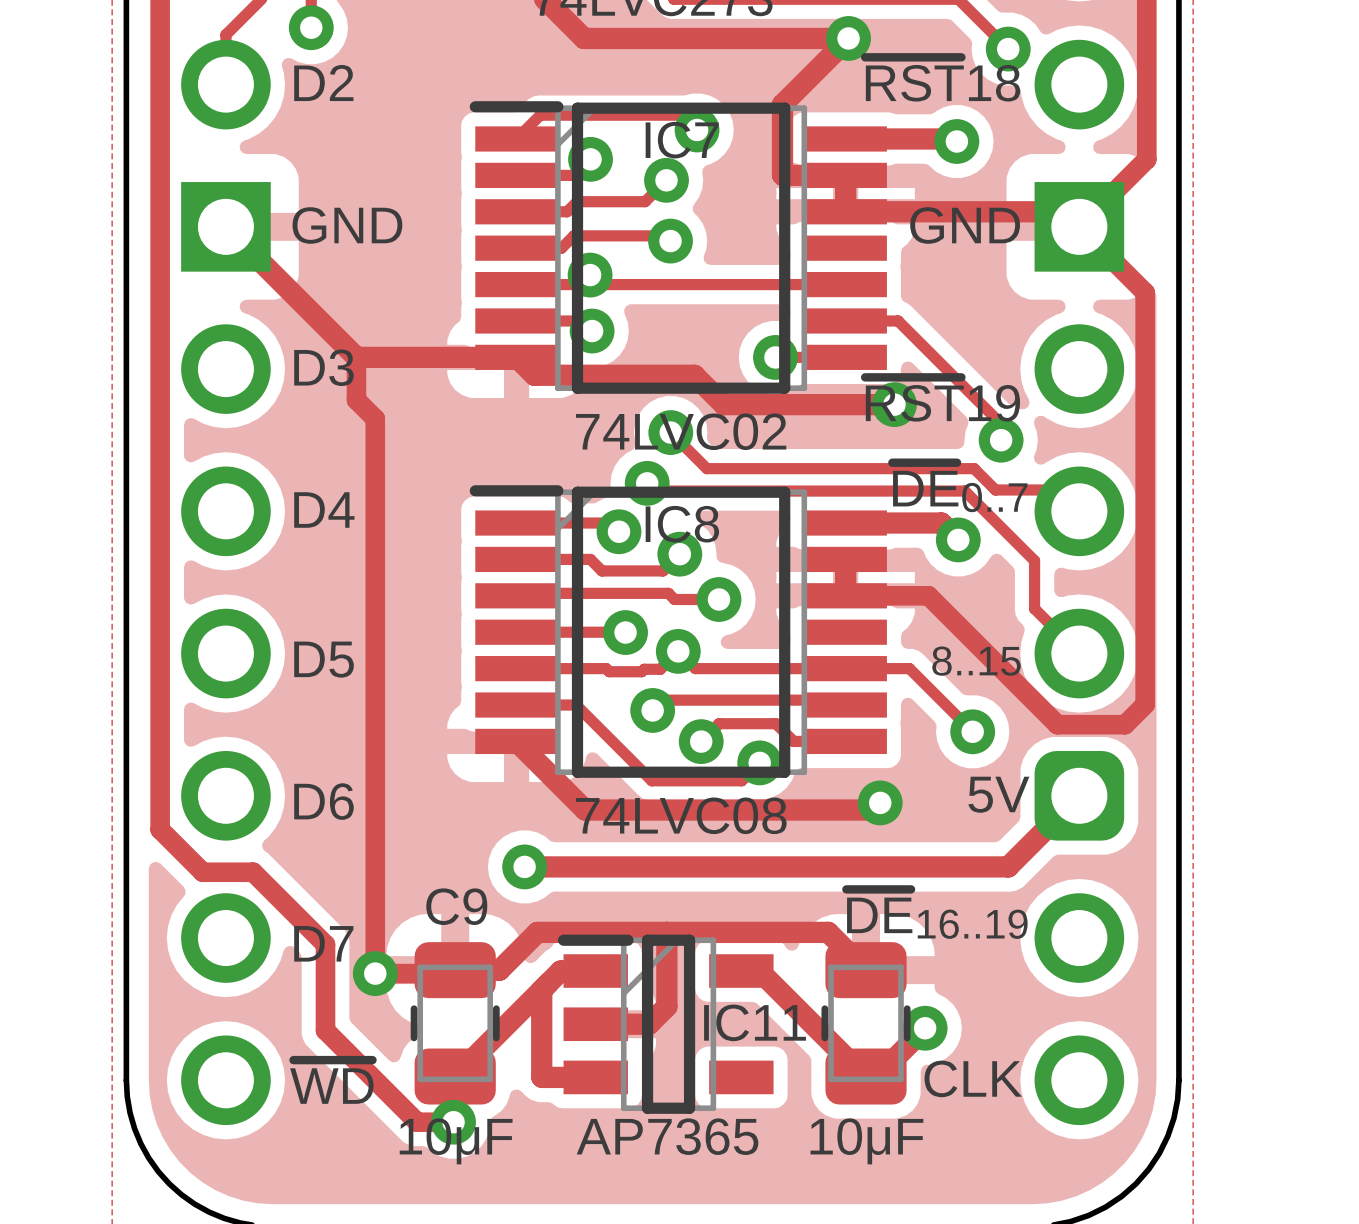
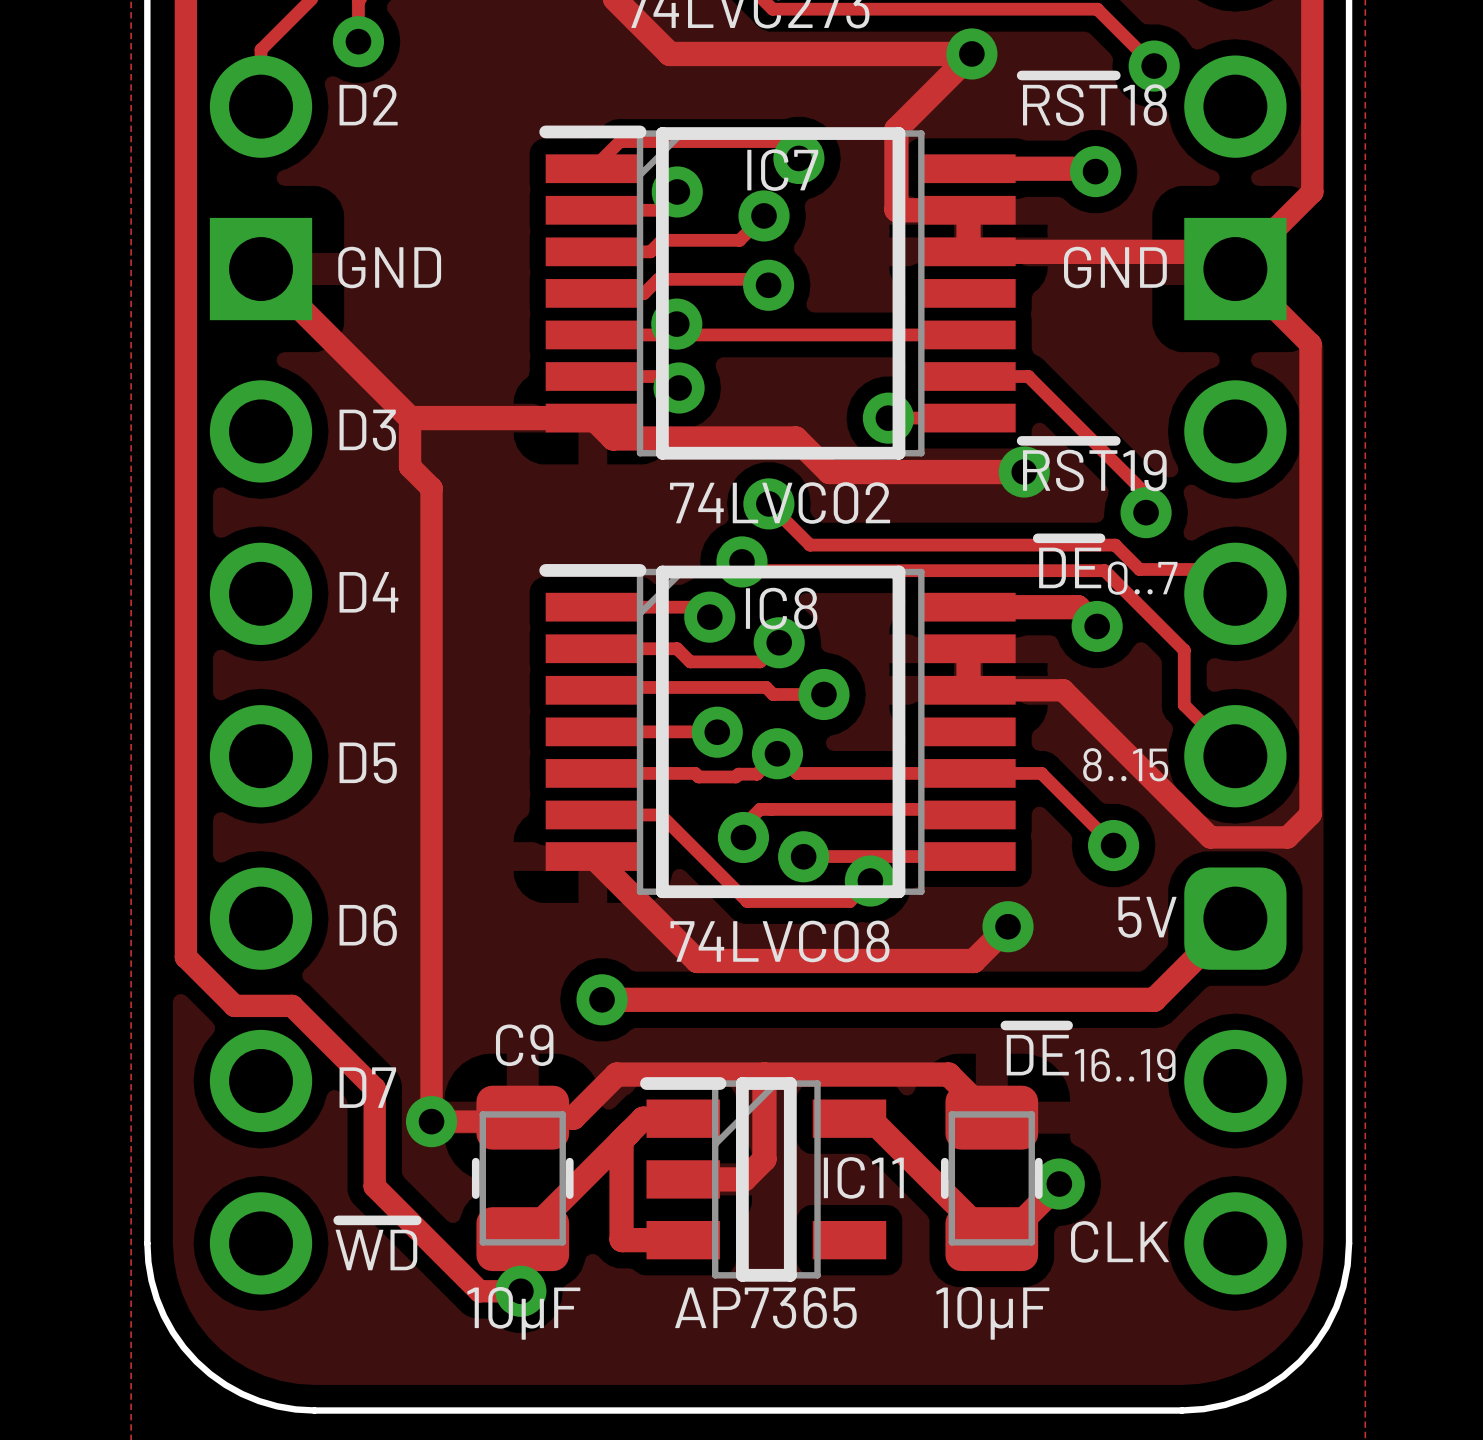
via position: (652, 710) -> (743, 837)
track: (701, 741) (719, 723) (775, 723) (793, 741) -> (809, 864) (817, 856) (909, 856)
track: (585, 810) (873, 810) -> (671, 934) (697, 961) (973, 961) (999, 934)

